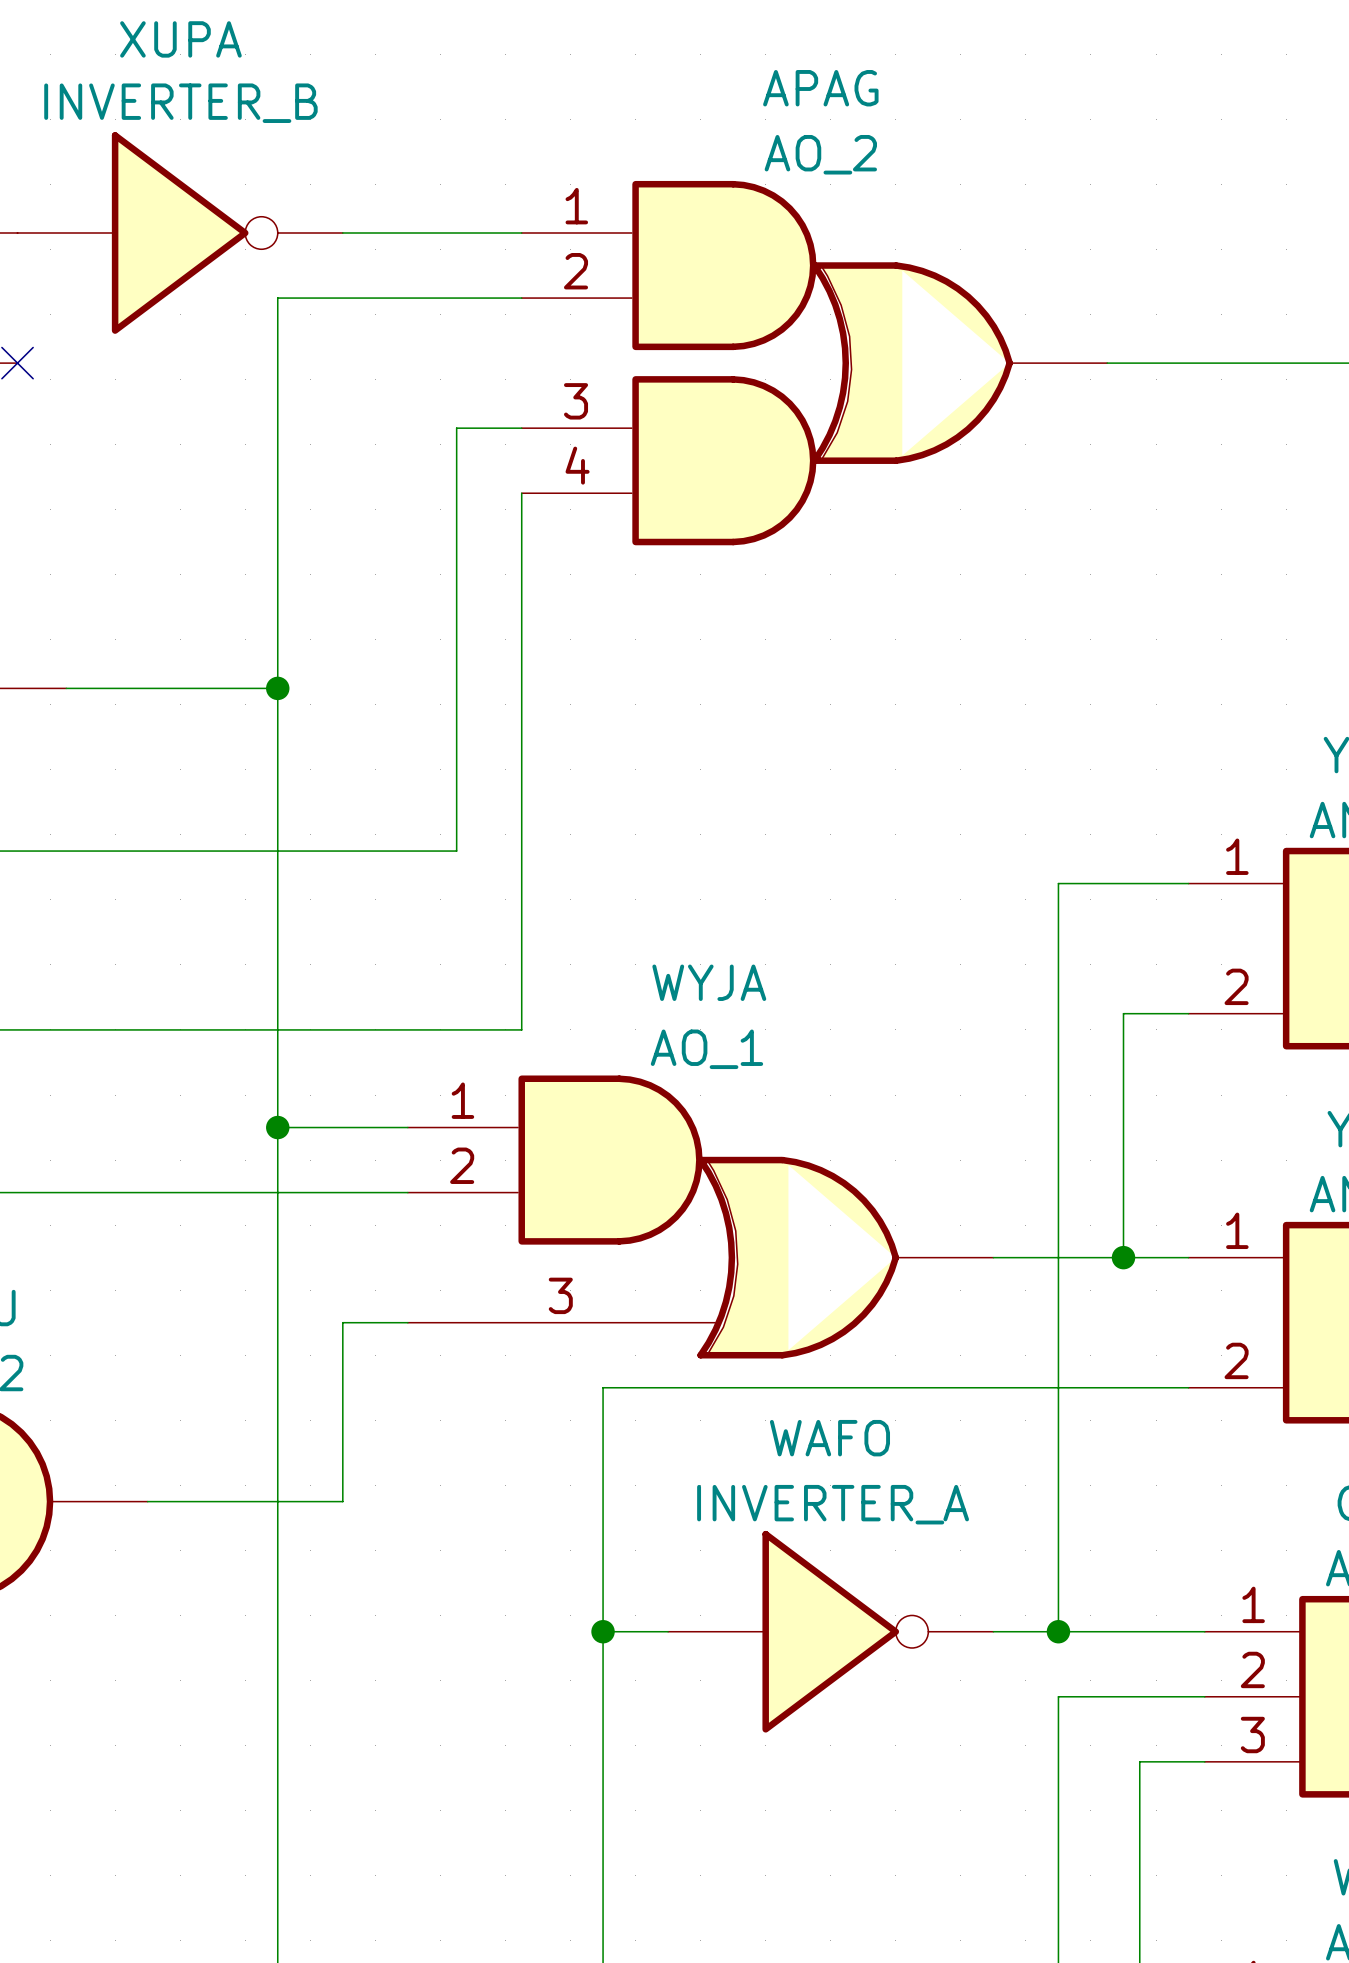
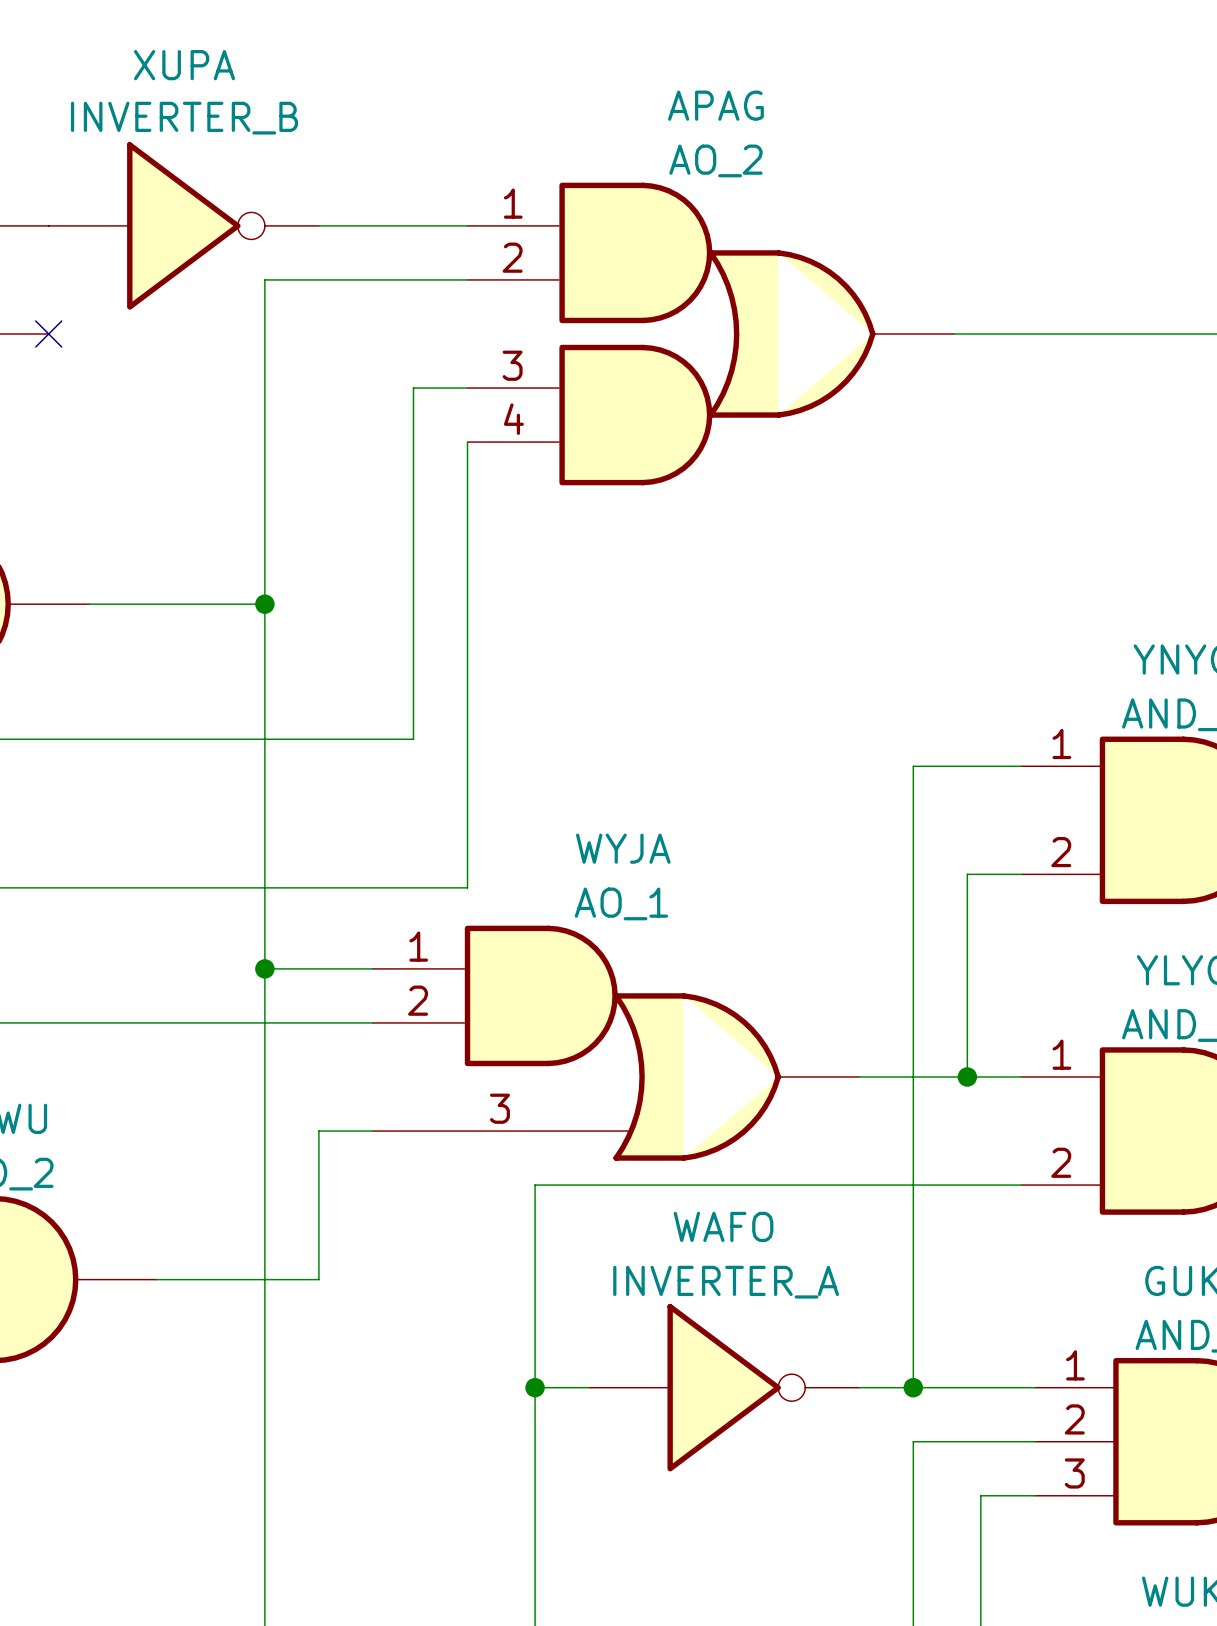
APAG symbol: [521, 180, 1108, 546] -> [467, 182, 954, 486]
WYJA symbol: [407, 1075, 994, 1359] -> [372, 925, 860, 1161]

